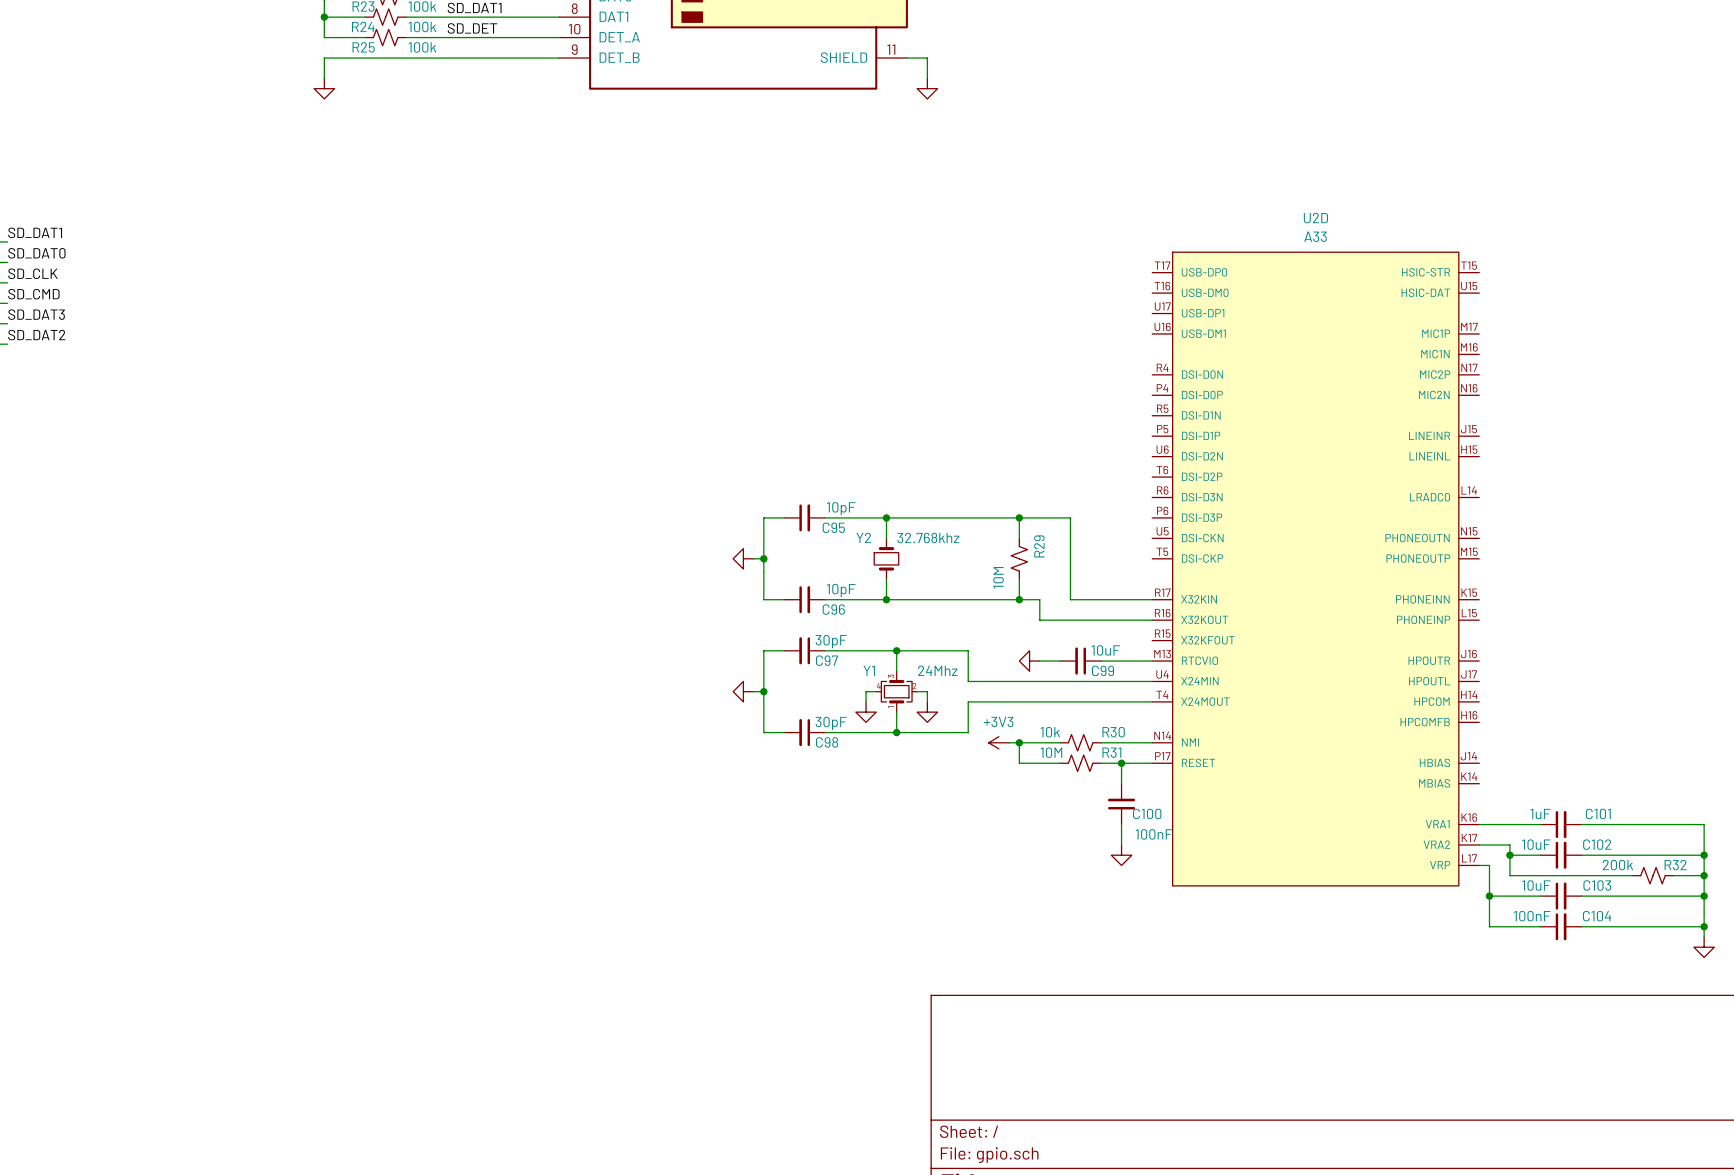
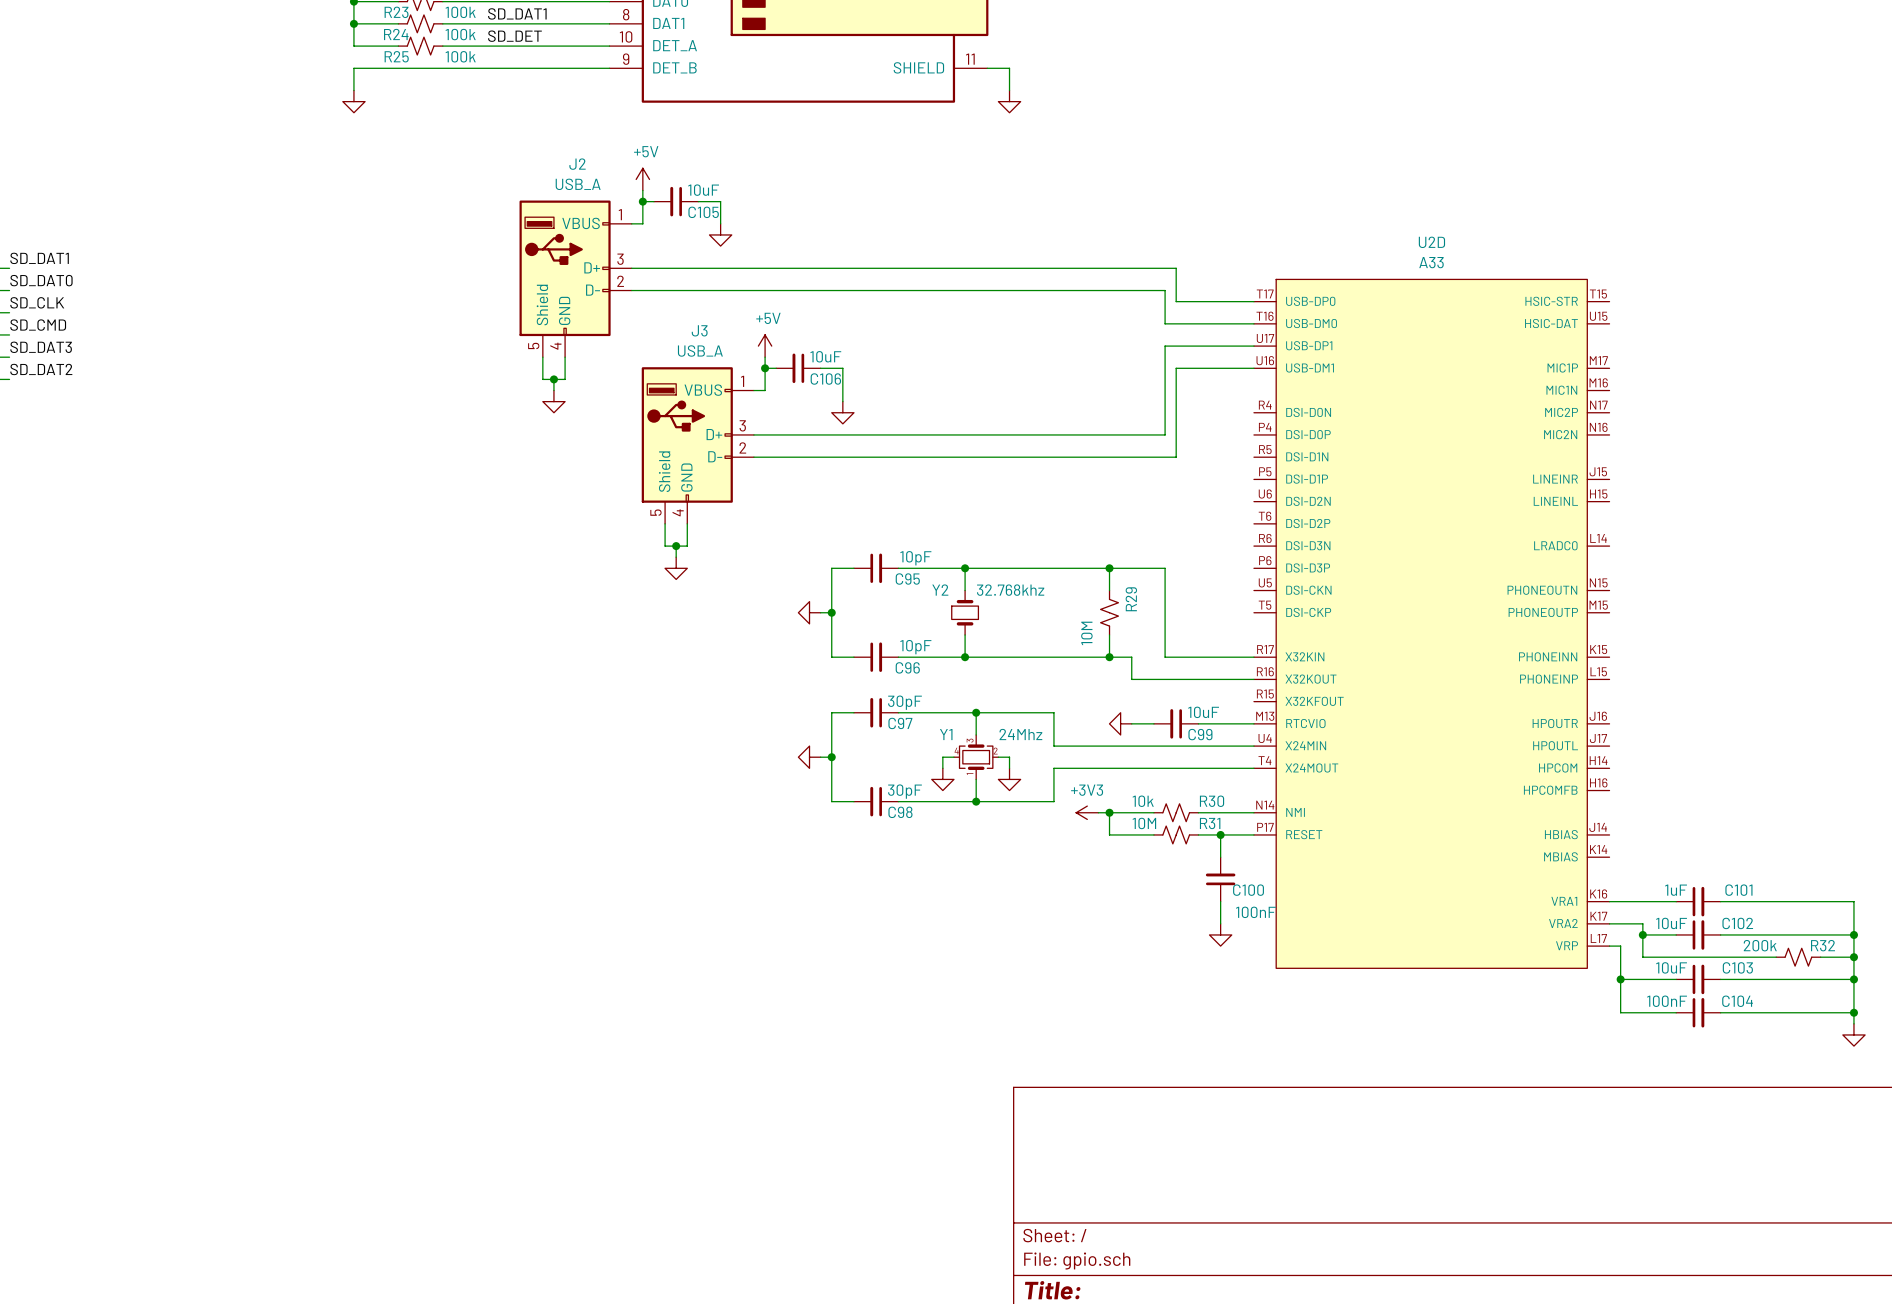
power symbol: none -> +5V (642, 179)
wire: none -> (642, 190) (642, 223) (631, 223)
wire: none -> (642, 201) (653, 201)
junction: none -> (642, 201)
C105: none -> 10uF (676, 201)
wire: none -> (698, 201) (720, 201) (720, 223)
power symbol: none -> (720, 234)
wire: none -> (631, 268) (1176, 268) (1176, 301) (1253, 301)
J2: none -> USB_A (575, 278)
wire: none -> (631, 290) (1165, 290) (1165, 323) (1253, 323)
power symbol: none -> +5V (765, 346)
wire: none -> (1253, 346) (1165, 346) (1165, 434) (753, 434)
wire: none -> (542, 357) (542, 379) (565, 379) (565, 357)
wire: none -> (765, 357) (765, 390) (753, 390)
wire: none -> (765, 368) (776, 368)
junction: none -> (765, 368)
C106: none -> 10uF (798, 368)
wire: none -> (820, 368) (842, 368) (842, 401)
wire: none -> (1253, 368) (1176, 368) (1176, 457) (753, 457)
wire: none -> (553, 379) (553, 390)
junction: none -> (553, 379)
power symbol: none -> (553, 401)
power symbol: none -> (842, 412)
J3: none -> USB_A (697, 445)
wire: none -> (665, 523) (665, 546) (687, 546) (687, 523)
wire: none -> (676, 546) (676, 557)
junction: none -> (676, 546)
power symbol: none -> (676, 568)

